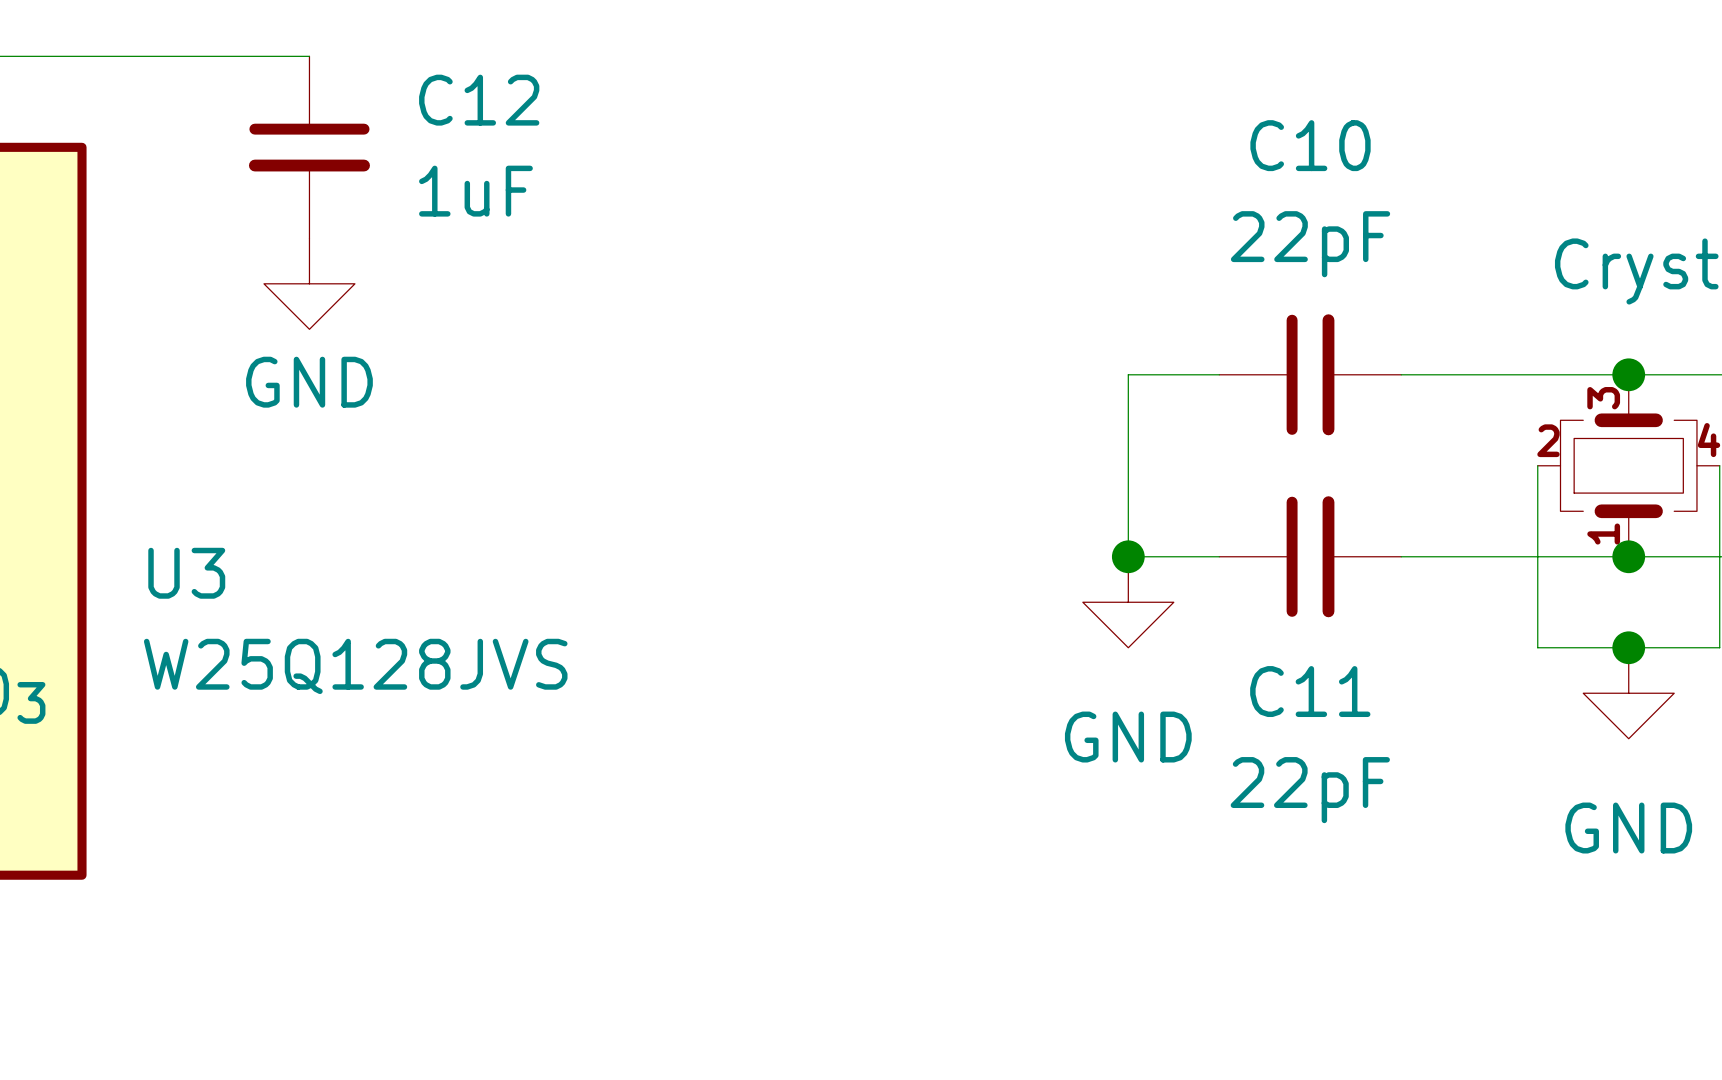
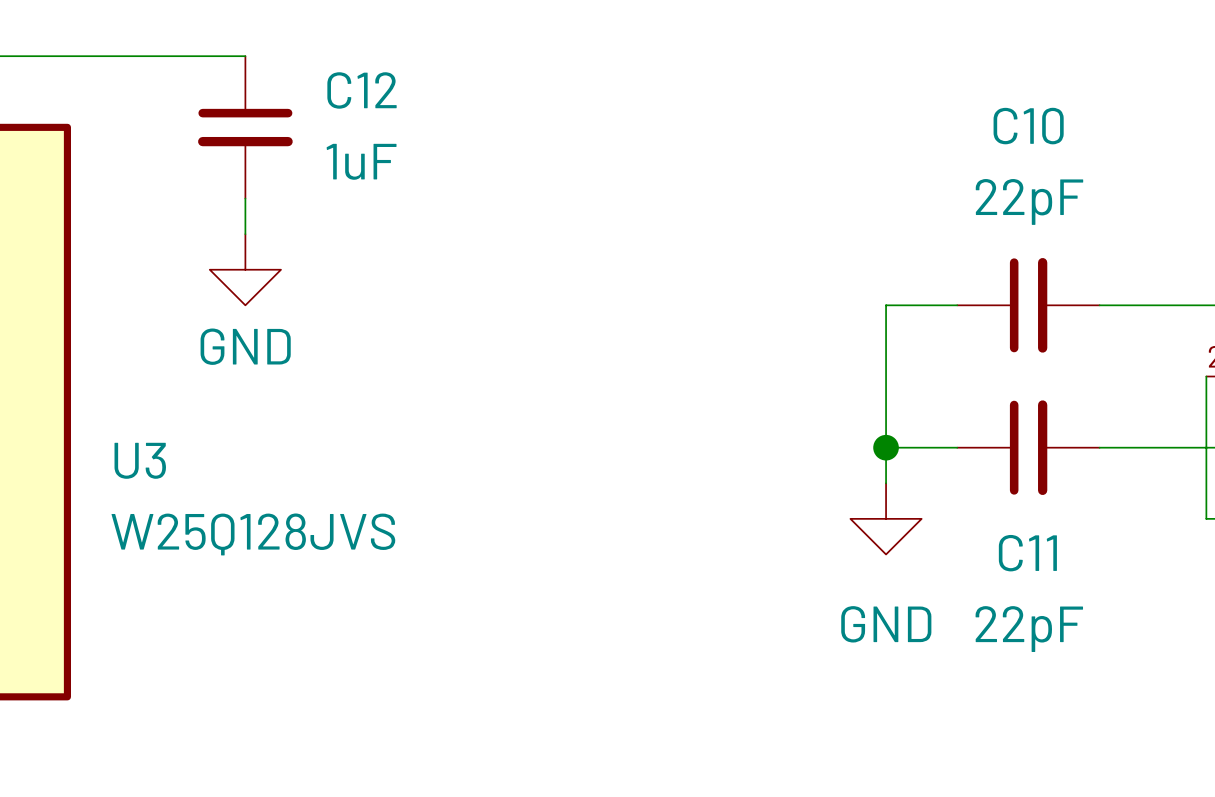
power symbol position: GND (309, 283) -> GND (245, 269)
power symbol position: GND (1128, 602) -> GND (886, 518)

